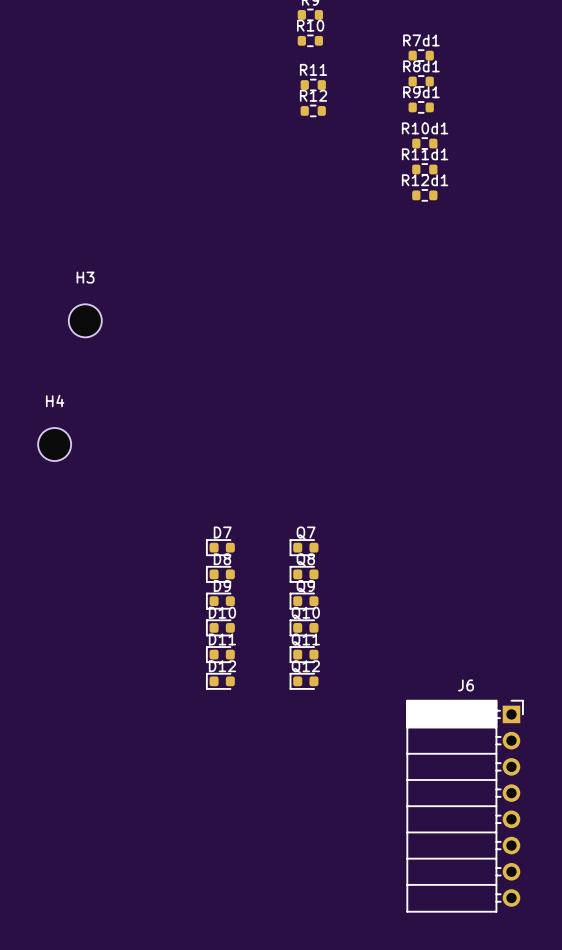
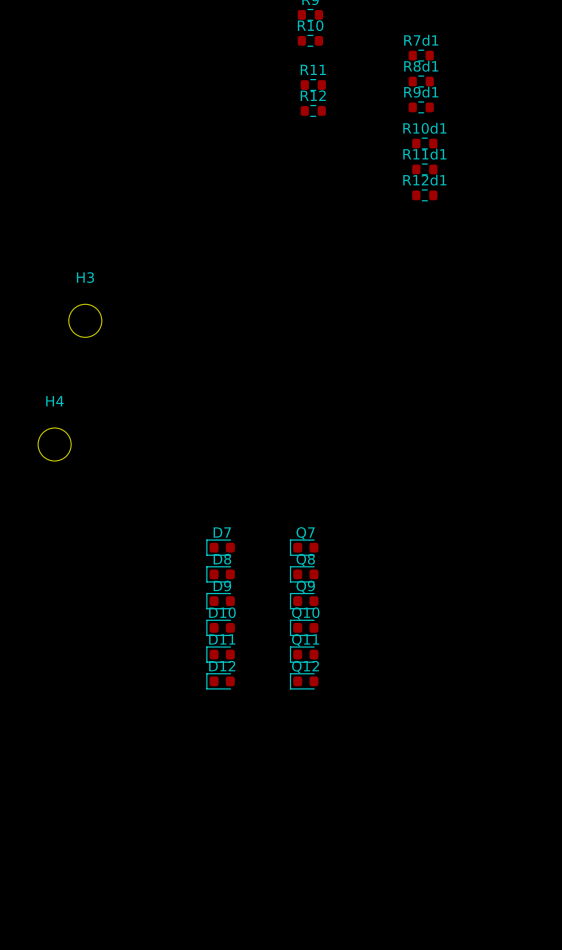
J6: (465, 806) -> none

